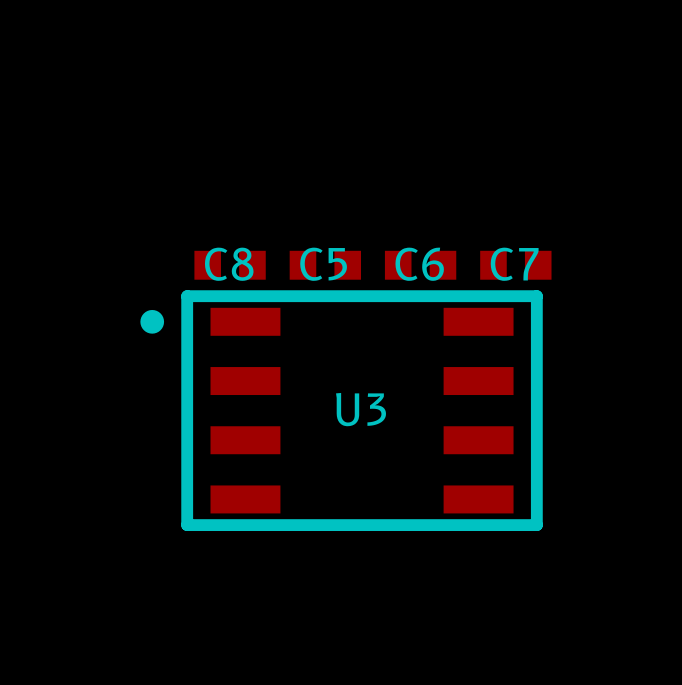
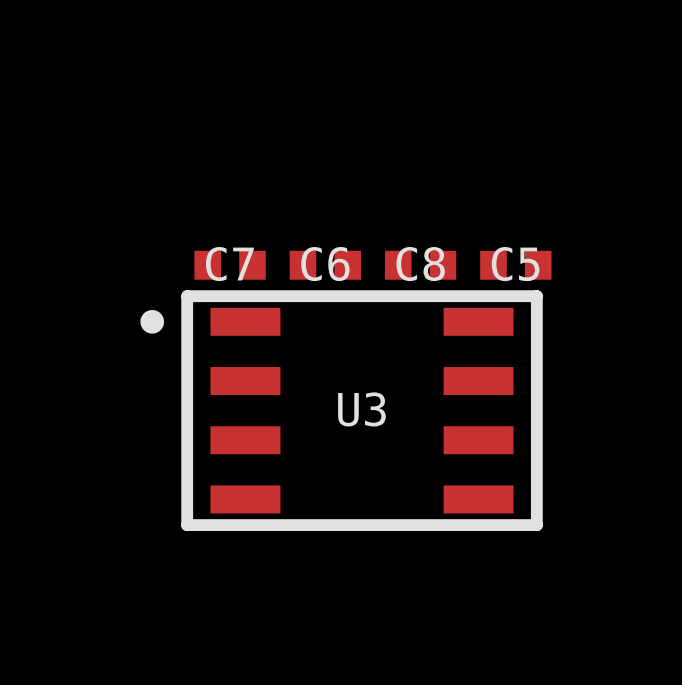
C8 name: C8 (229, 264) -> C7 (229, 264)
C5 name: C5 (323, 264) -> C6 (325, 264)
C6 name: C6 (419, 264) -> C8 (420, 264)
C7 name: C7 (514, 264) -> C5 (515, 264)

